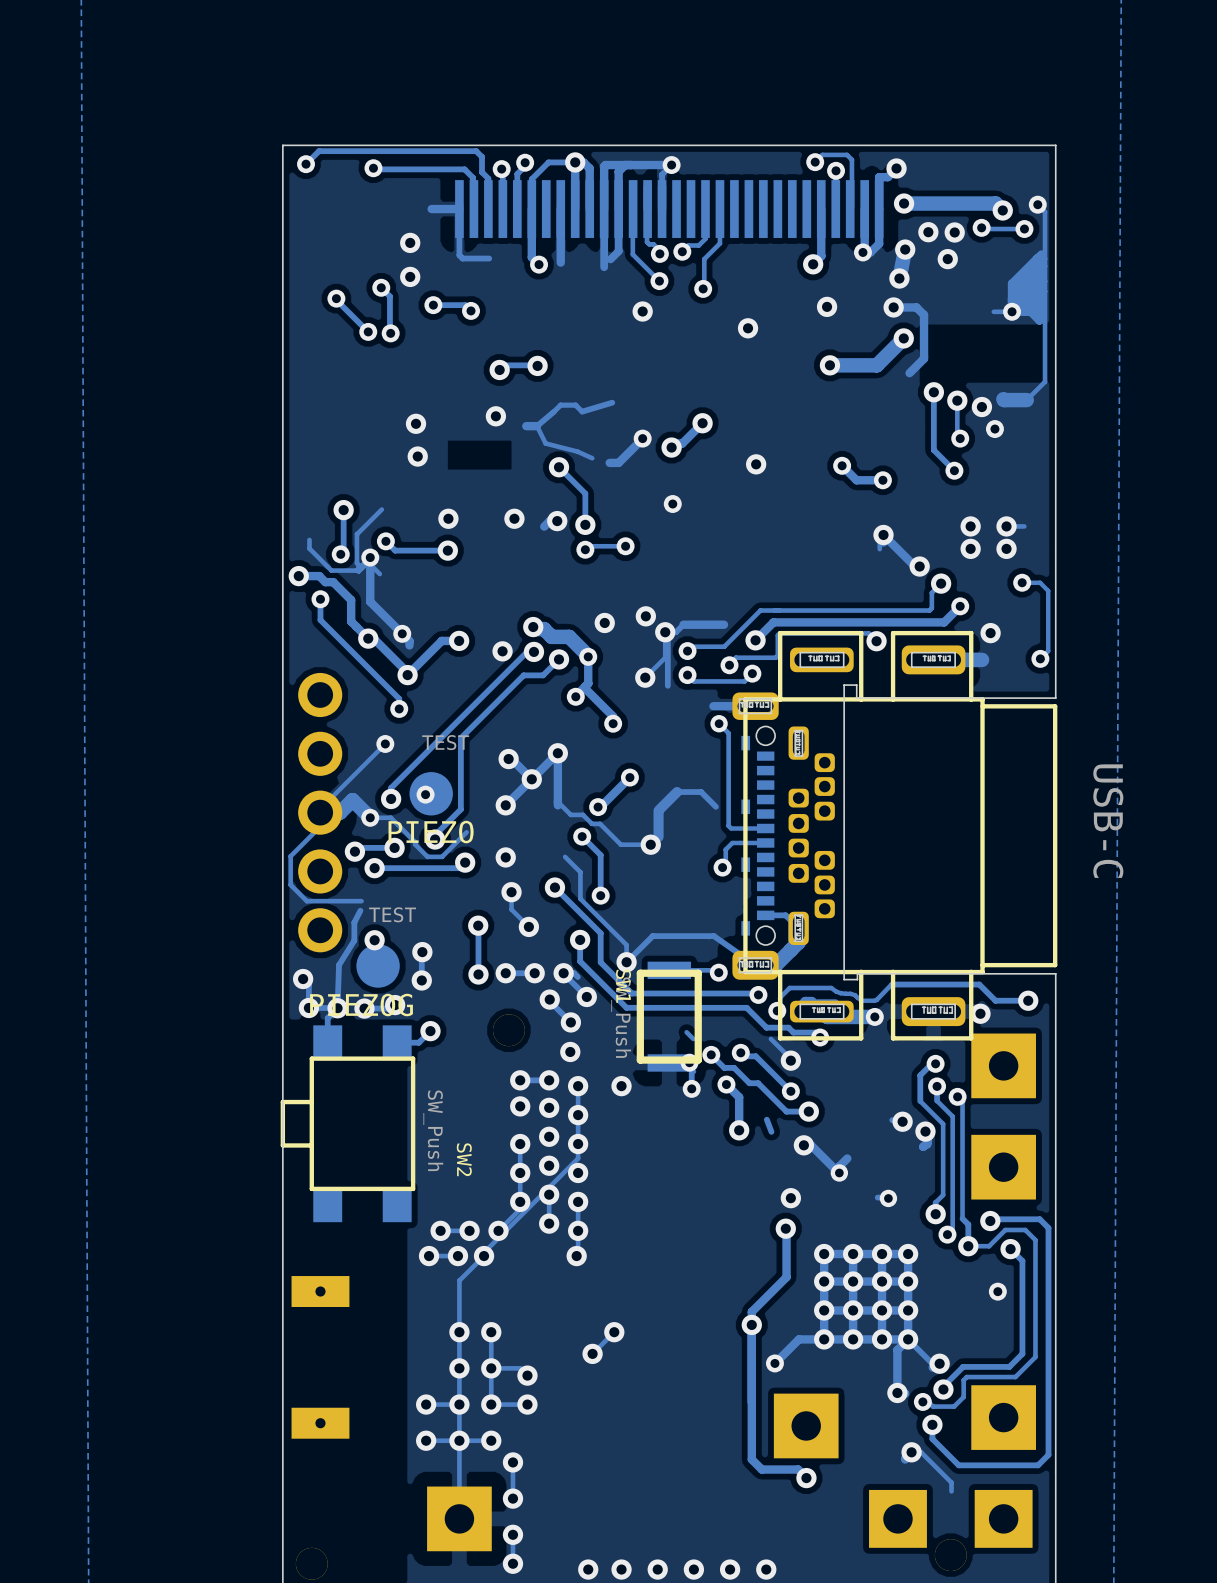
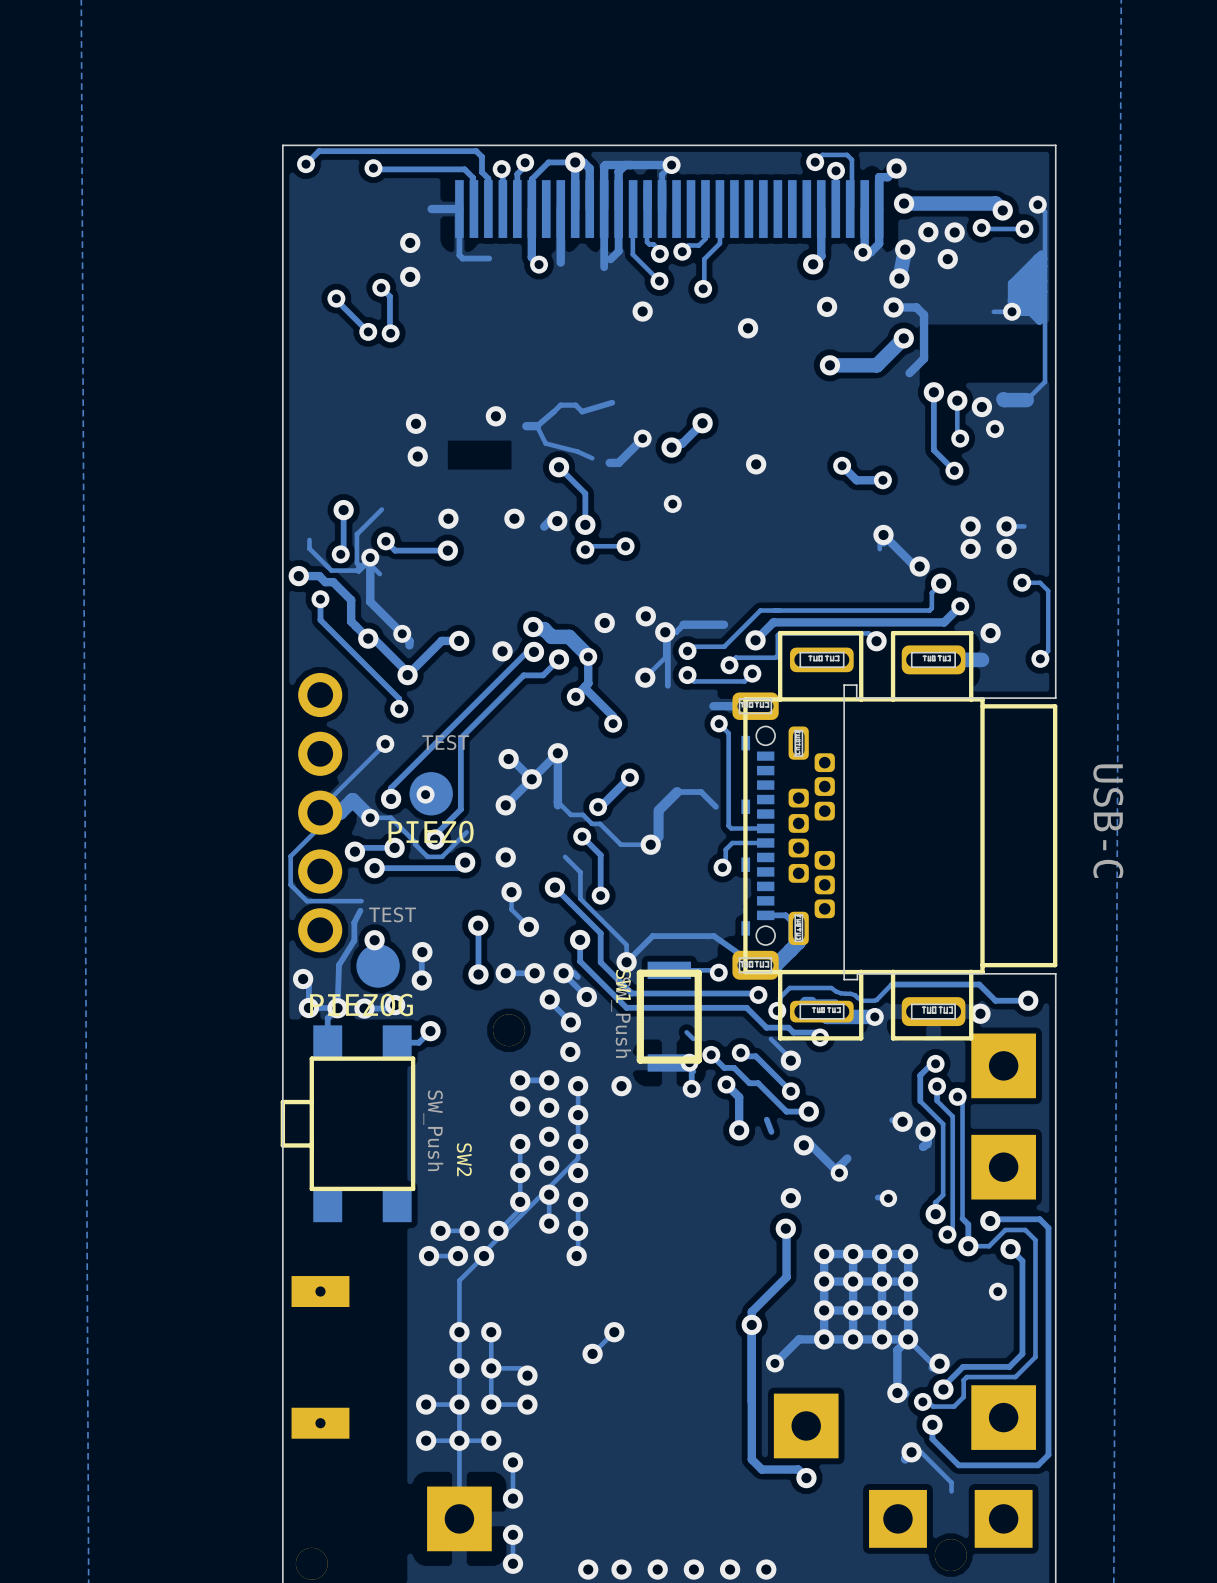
track: (433, 305) (465, 305) (471, 310) -> none
via: (433, 305) -> none
via: (471, 310) -> none
track: (537, 365) (504, 365) (499, 369) -> none
via: (537, 365) -> none
via: (499, 369) -> none

